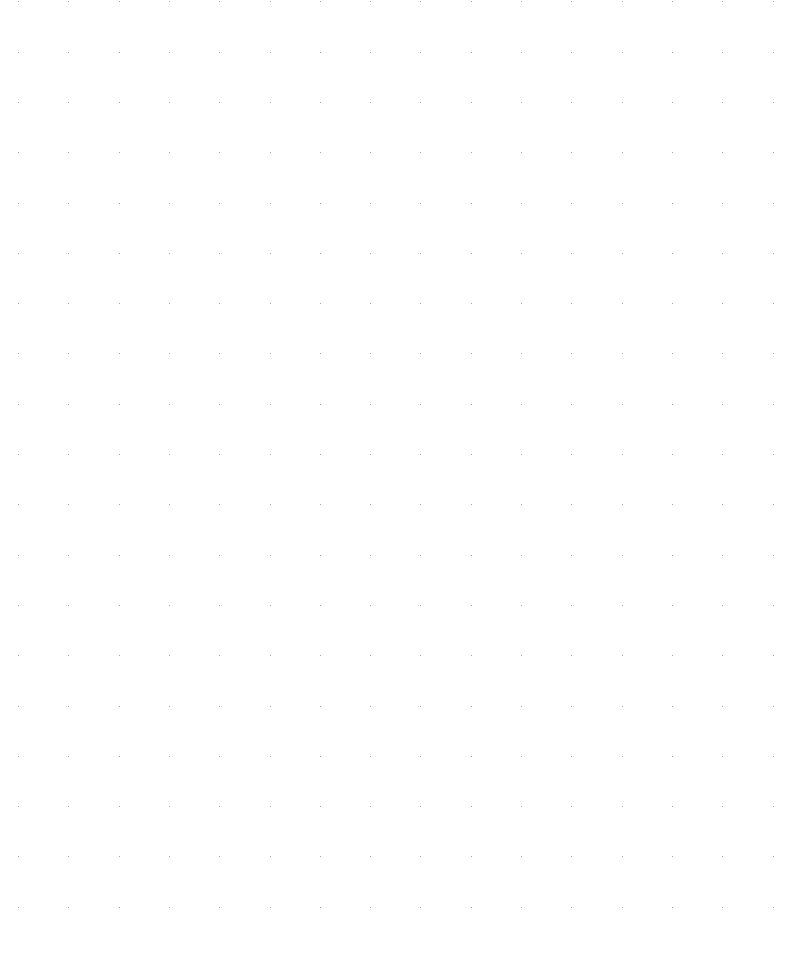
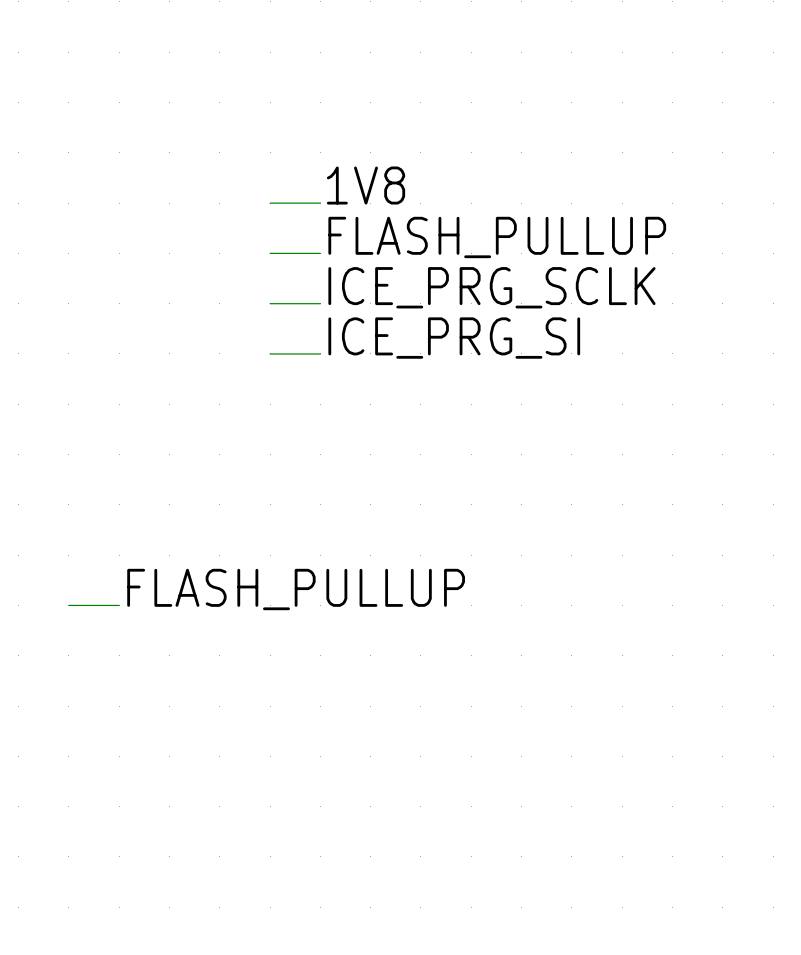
label: none -> 1V8 (366, 185)
wire: none -> (270, 203) (320, 203)
label: none -> FLASH_PULLUP (497, 237)
wire: none -> (270, 253) (320, 253)
label: none -> ICE_PRG_SCLK (491, 287)
wire: none -> (270, 303) (320, 303)
label: none -> ICE_PRG_SI (454, 338)
wire: none -> (270, 353) (320, 353)
label: none -> FLASH_PULLUP (296, 589)
wire: none -> (68, 605) (119, 605)

